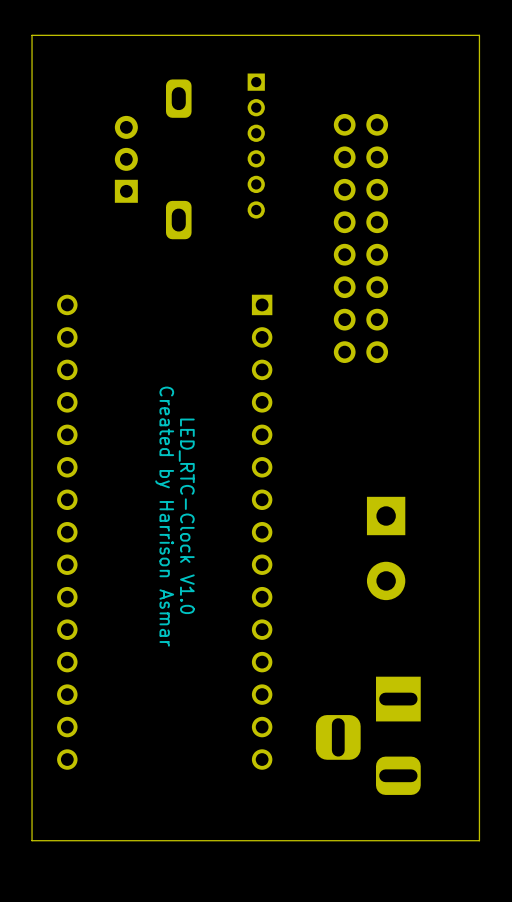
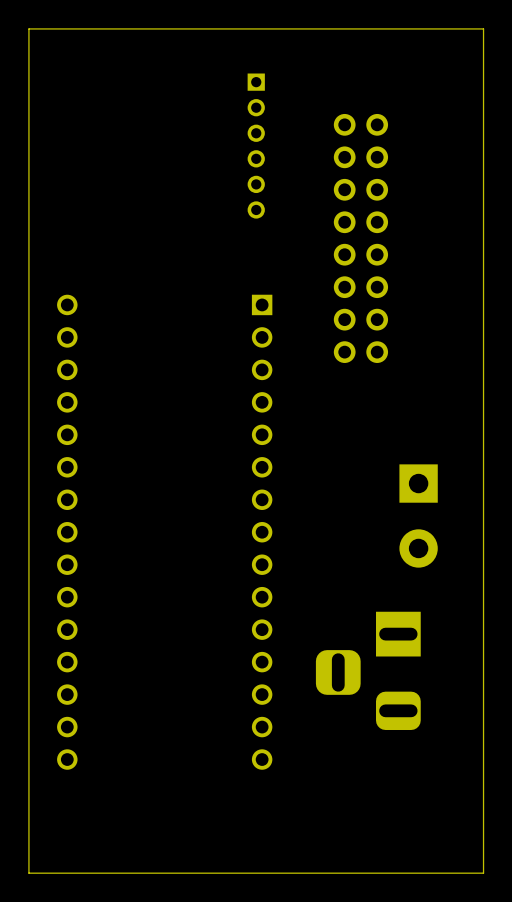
board edge: (479, 35) (32, 35) (32, 840) (479, 840) (479, 35) -> (483, 28) (483, 873) (28, 873) (28, 28) (483, 28)
part: (153, 159) -> none
text: Created by Harrison Asmar (164, 516) -> none
text: LED_RTC-Clock V1.0 (186, 516) -> none
part position: (386, 548) -> (418, 516)
part position: (368, 735) -> (368, 670)

